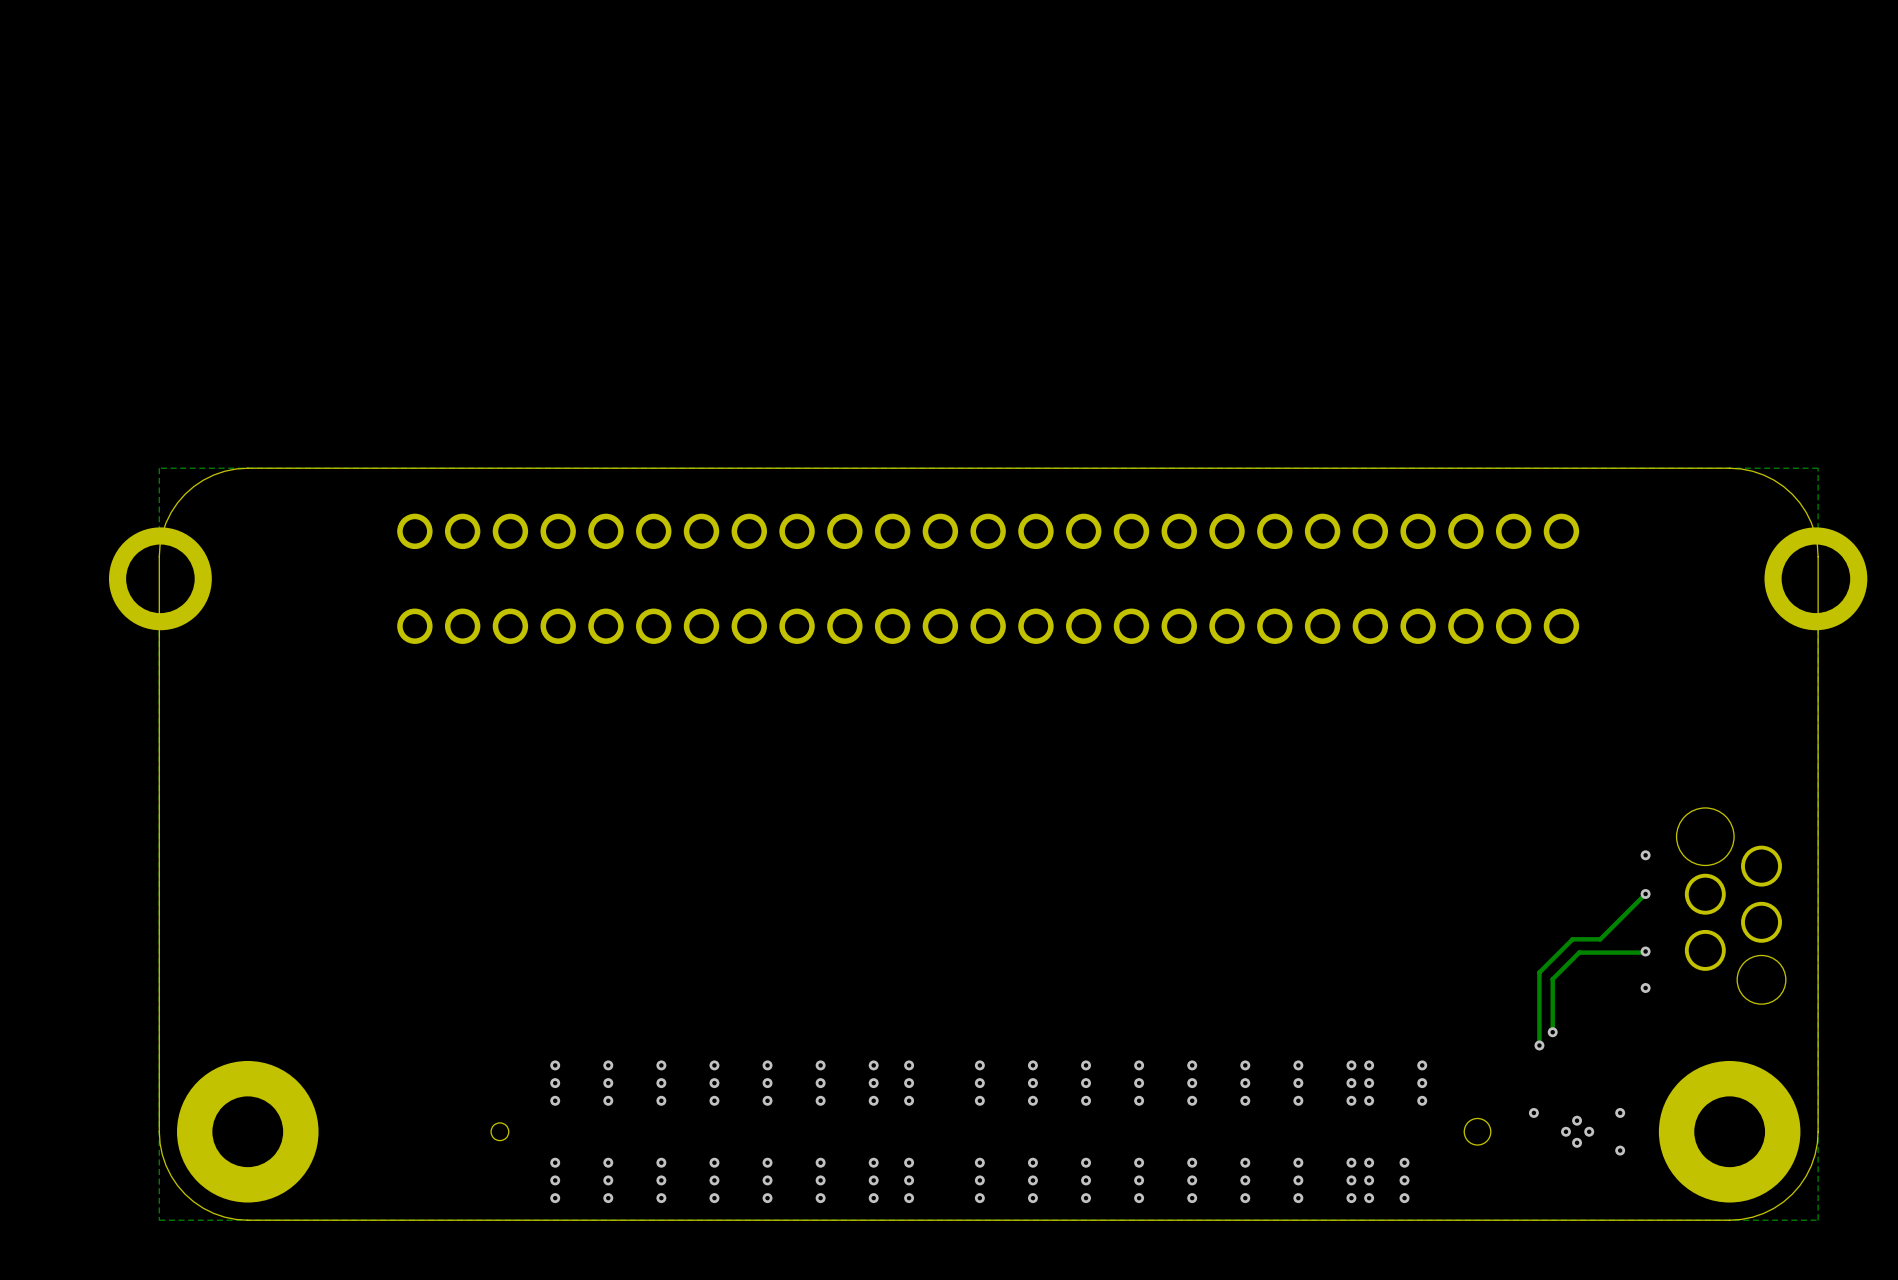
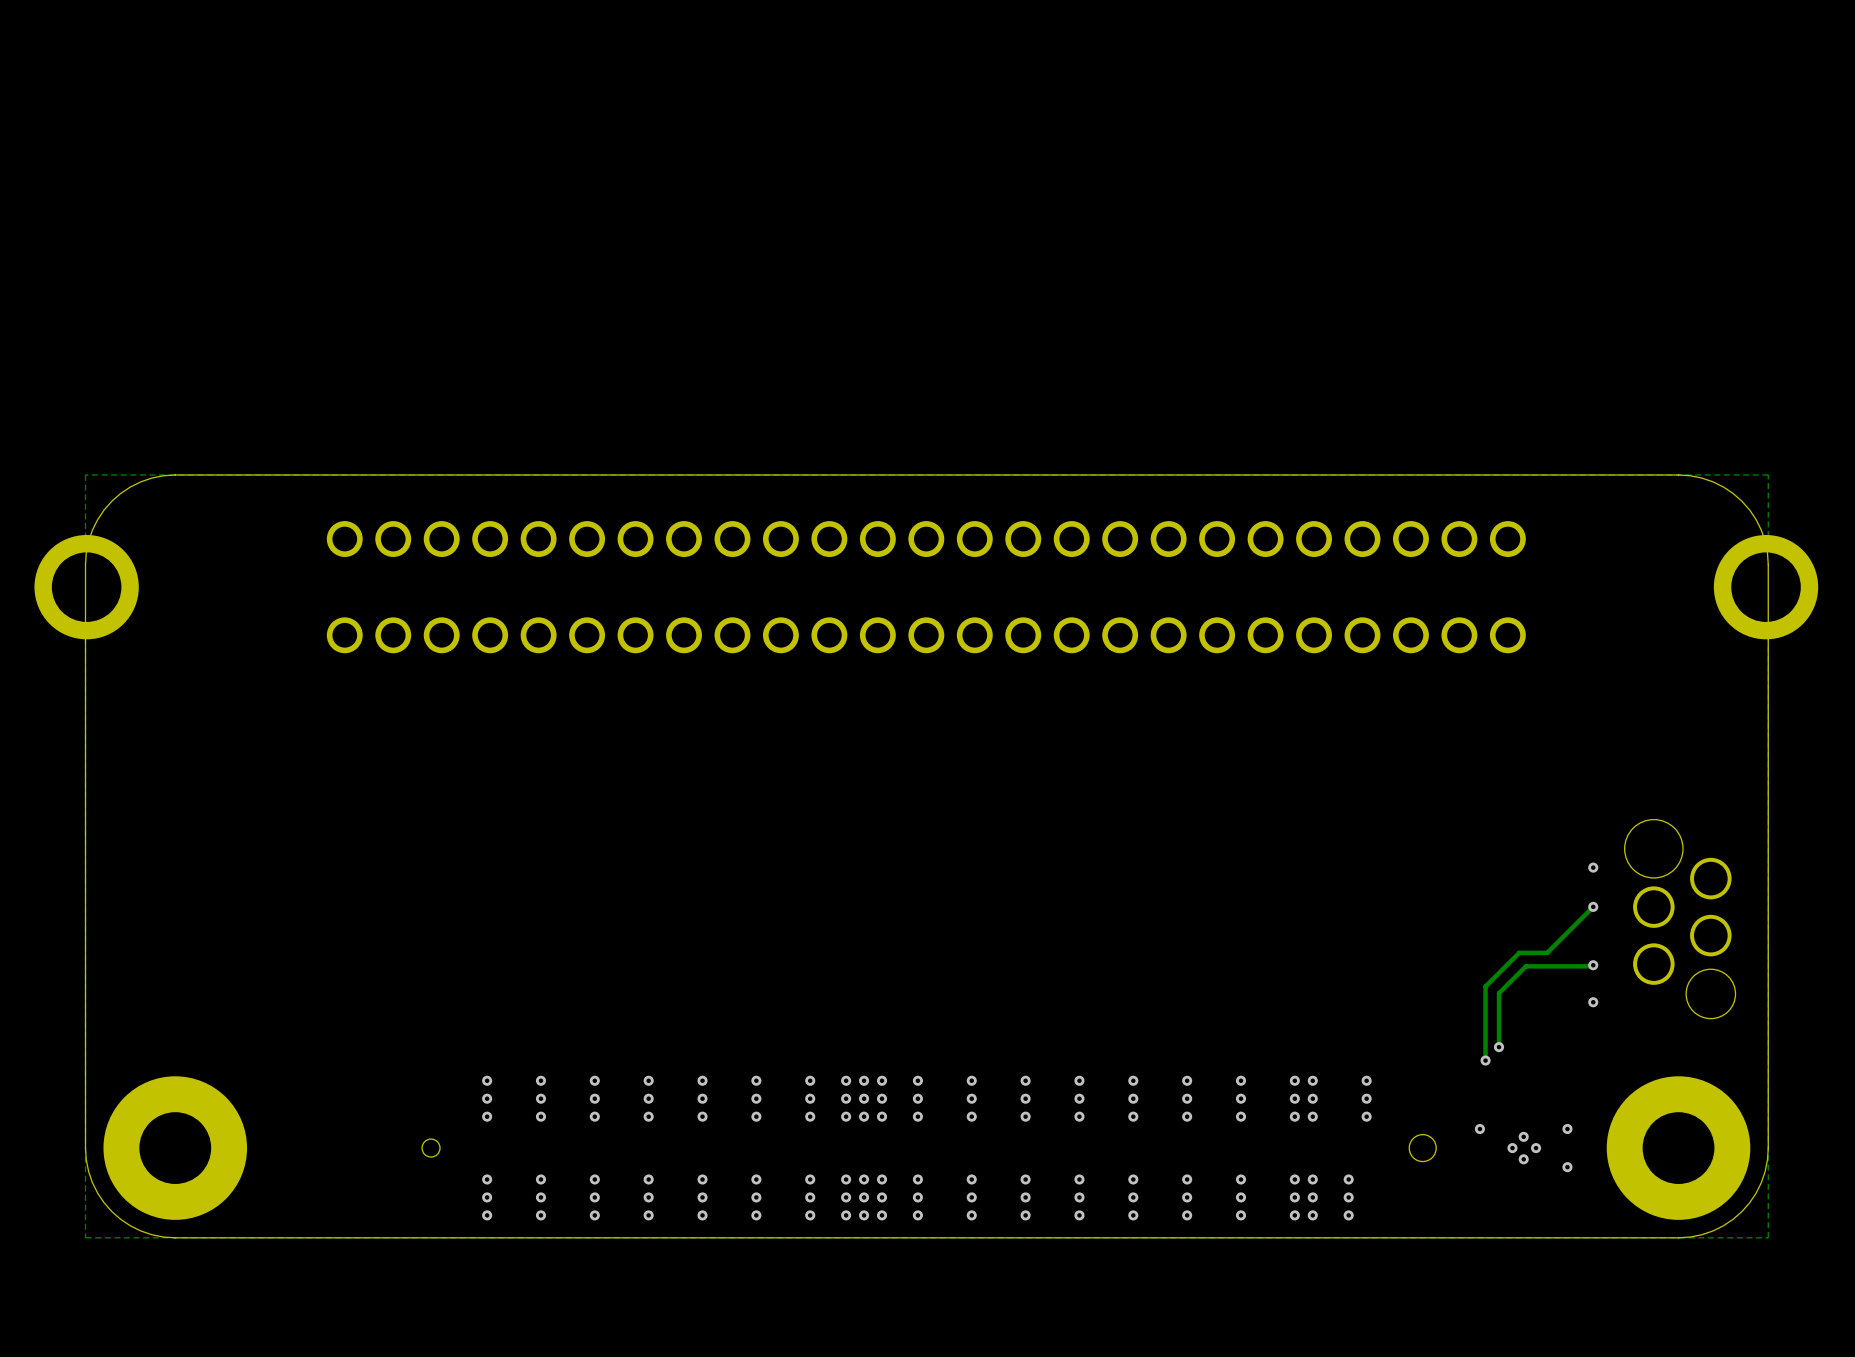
via: none -> (864, 1080)
via: none -> (882, 1080)
via: none -> (864, 1098)
via: none -> (882, 1098)
via: none -> (864, 1116)
via: none -> (882, 1116)
via: none -> (864, 1179)
via: none -> (882, 1179)
via: none -> (864, 1197)
via: none -> (882, 1197)
via: none -> (864, 1215)
via: none -> (882, 1215)

